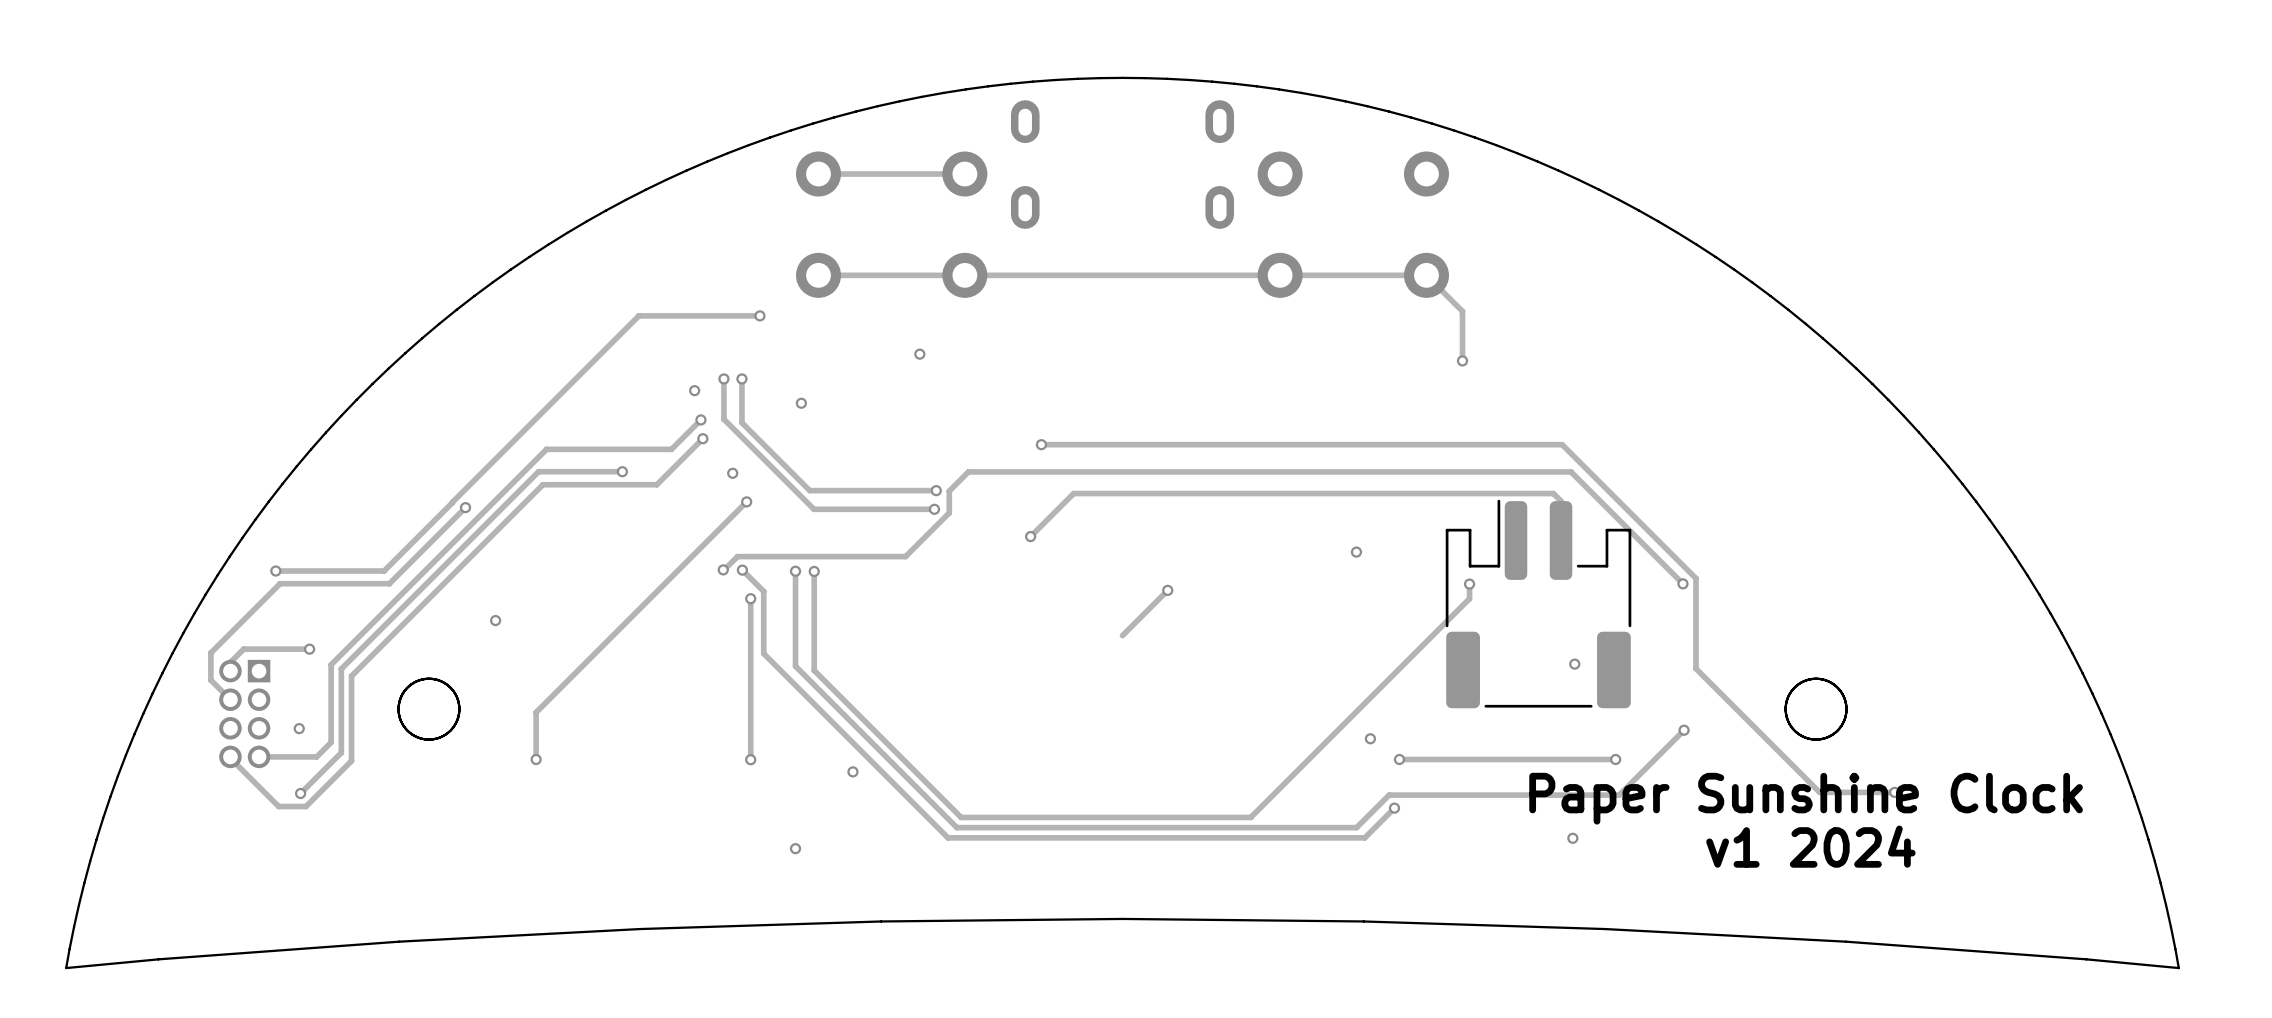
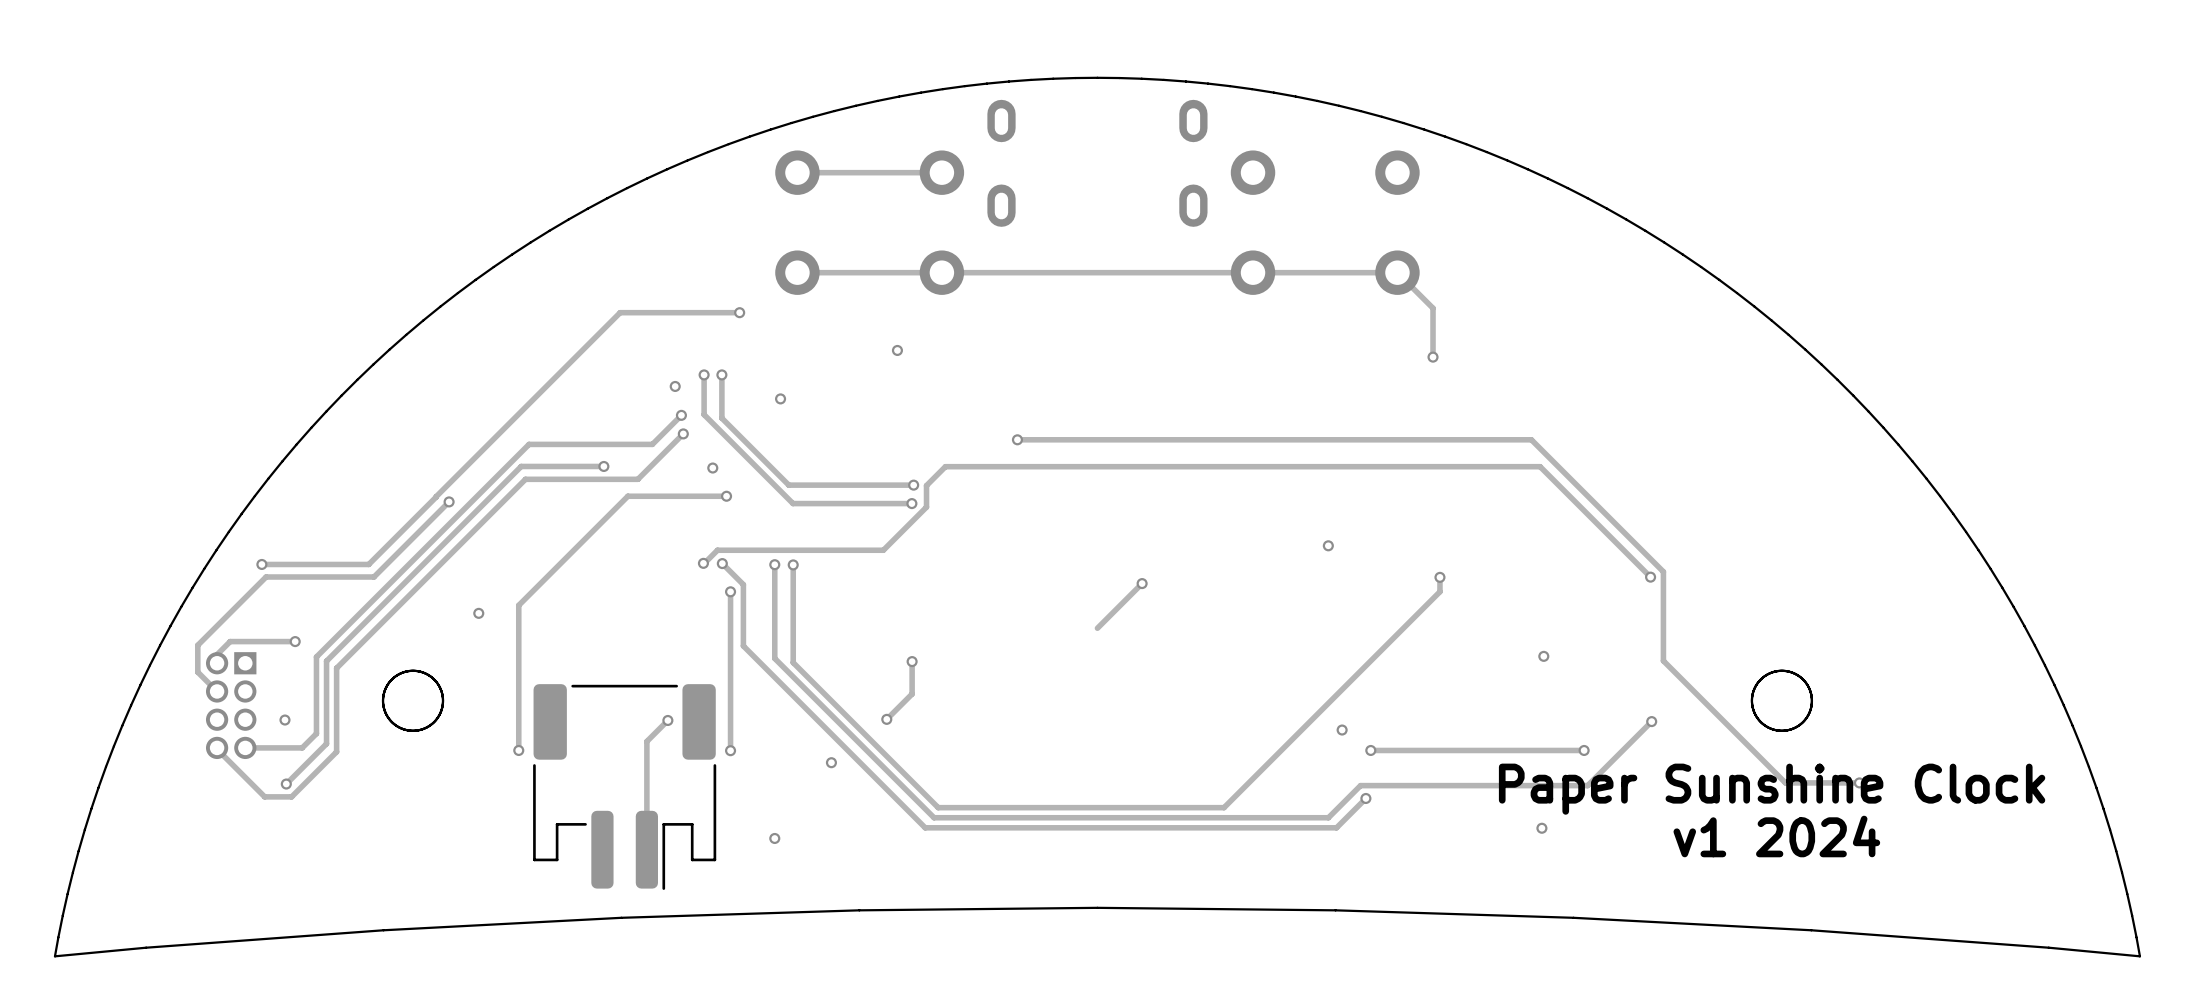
track: (746, 501) (536, 712) -> (726, 496) (627, 496) (518, 605) (518, 704)
track: (1030, 536) (1073, 493) (1553, 493) (1561, 501) (1561, 540) -> none
via: (1030, 536) -> none
part: (1538, 604) -> none
track: none -> (912, 661) (912, 694) (886, 719)
via: none -> (912, 661)
via: none -> (886, 719)
track: none -> (667, 720) (646, 741) (646, 849)
via: none -> (667, 720)
part: none -> (624, 787)

